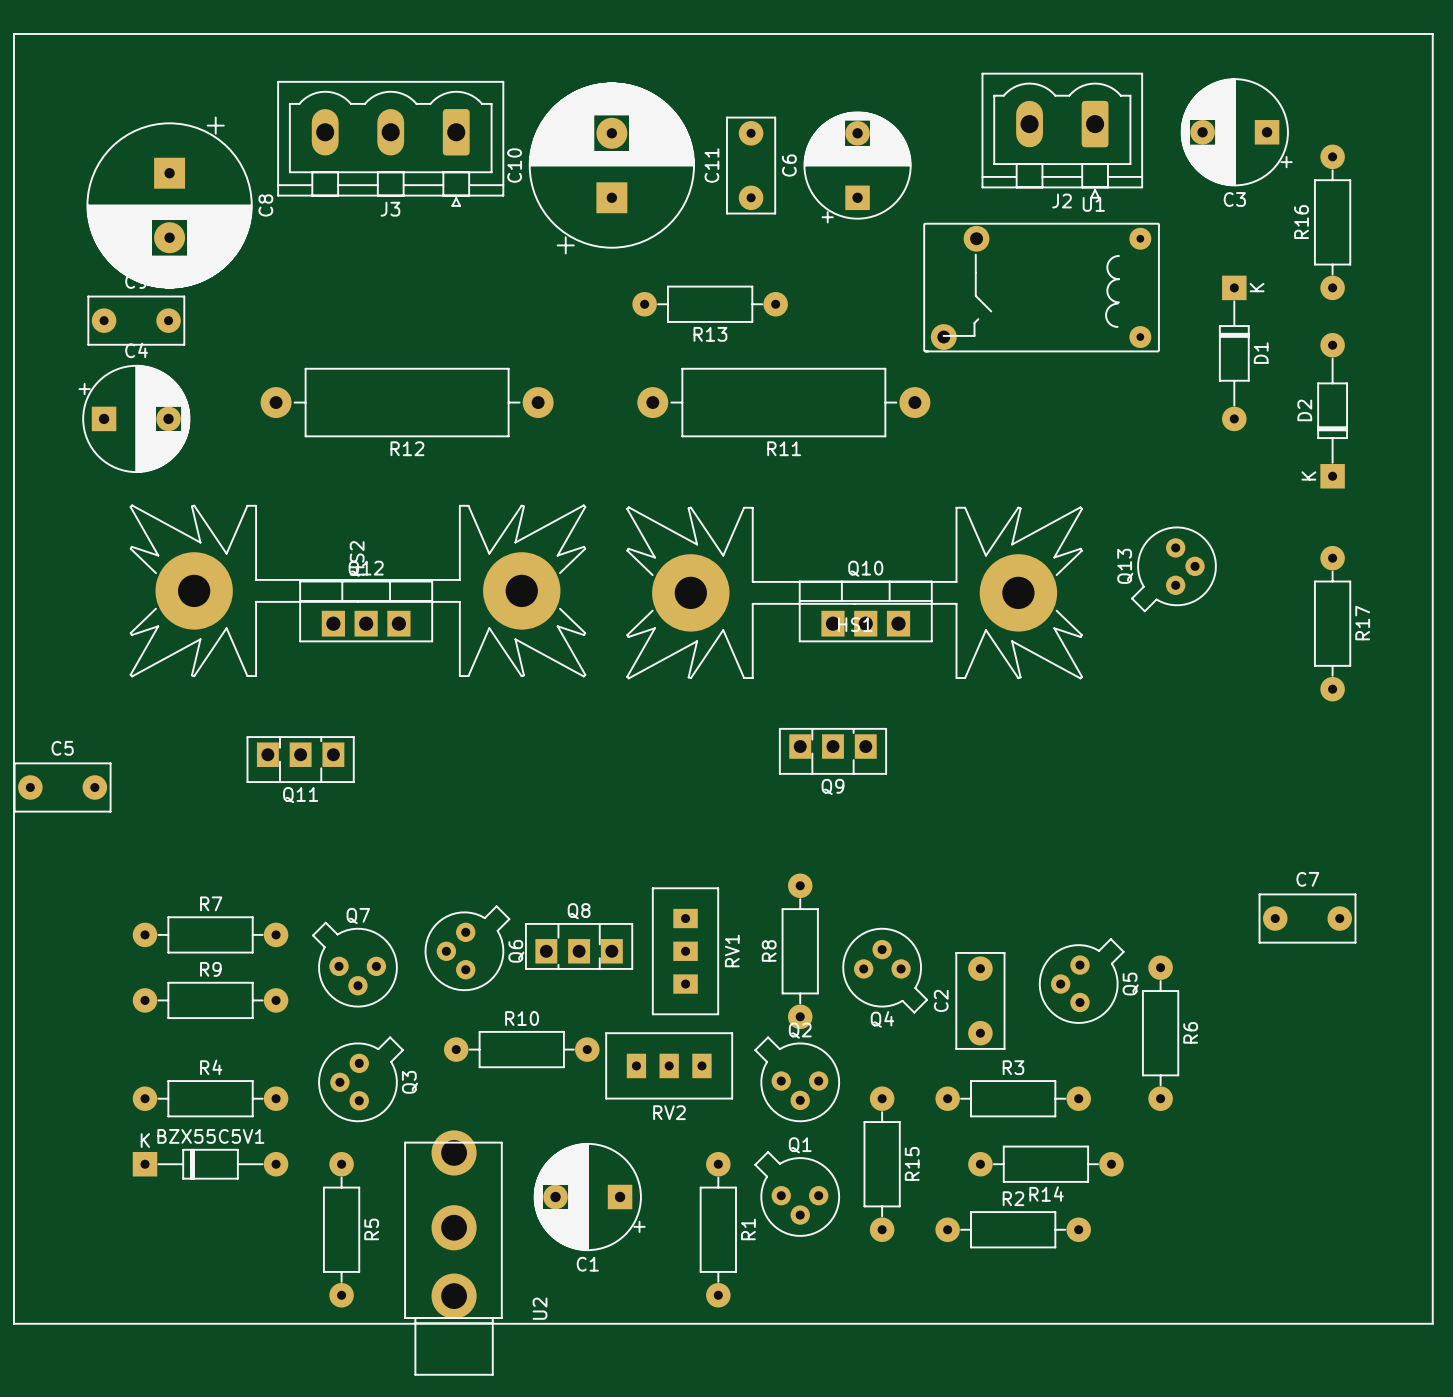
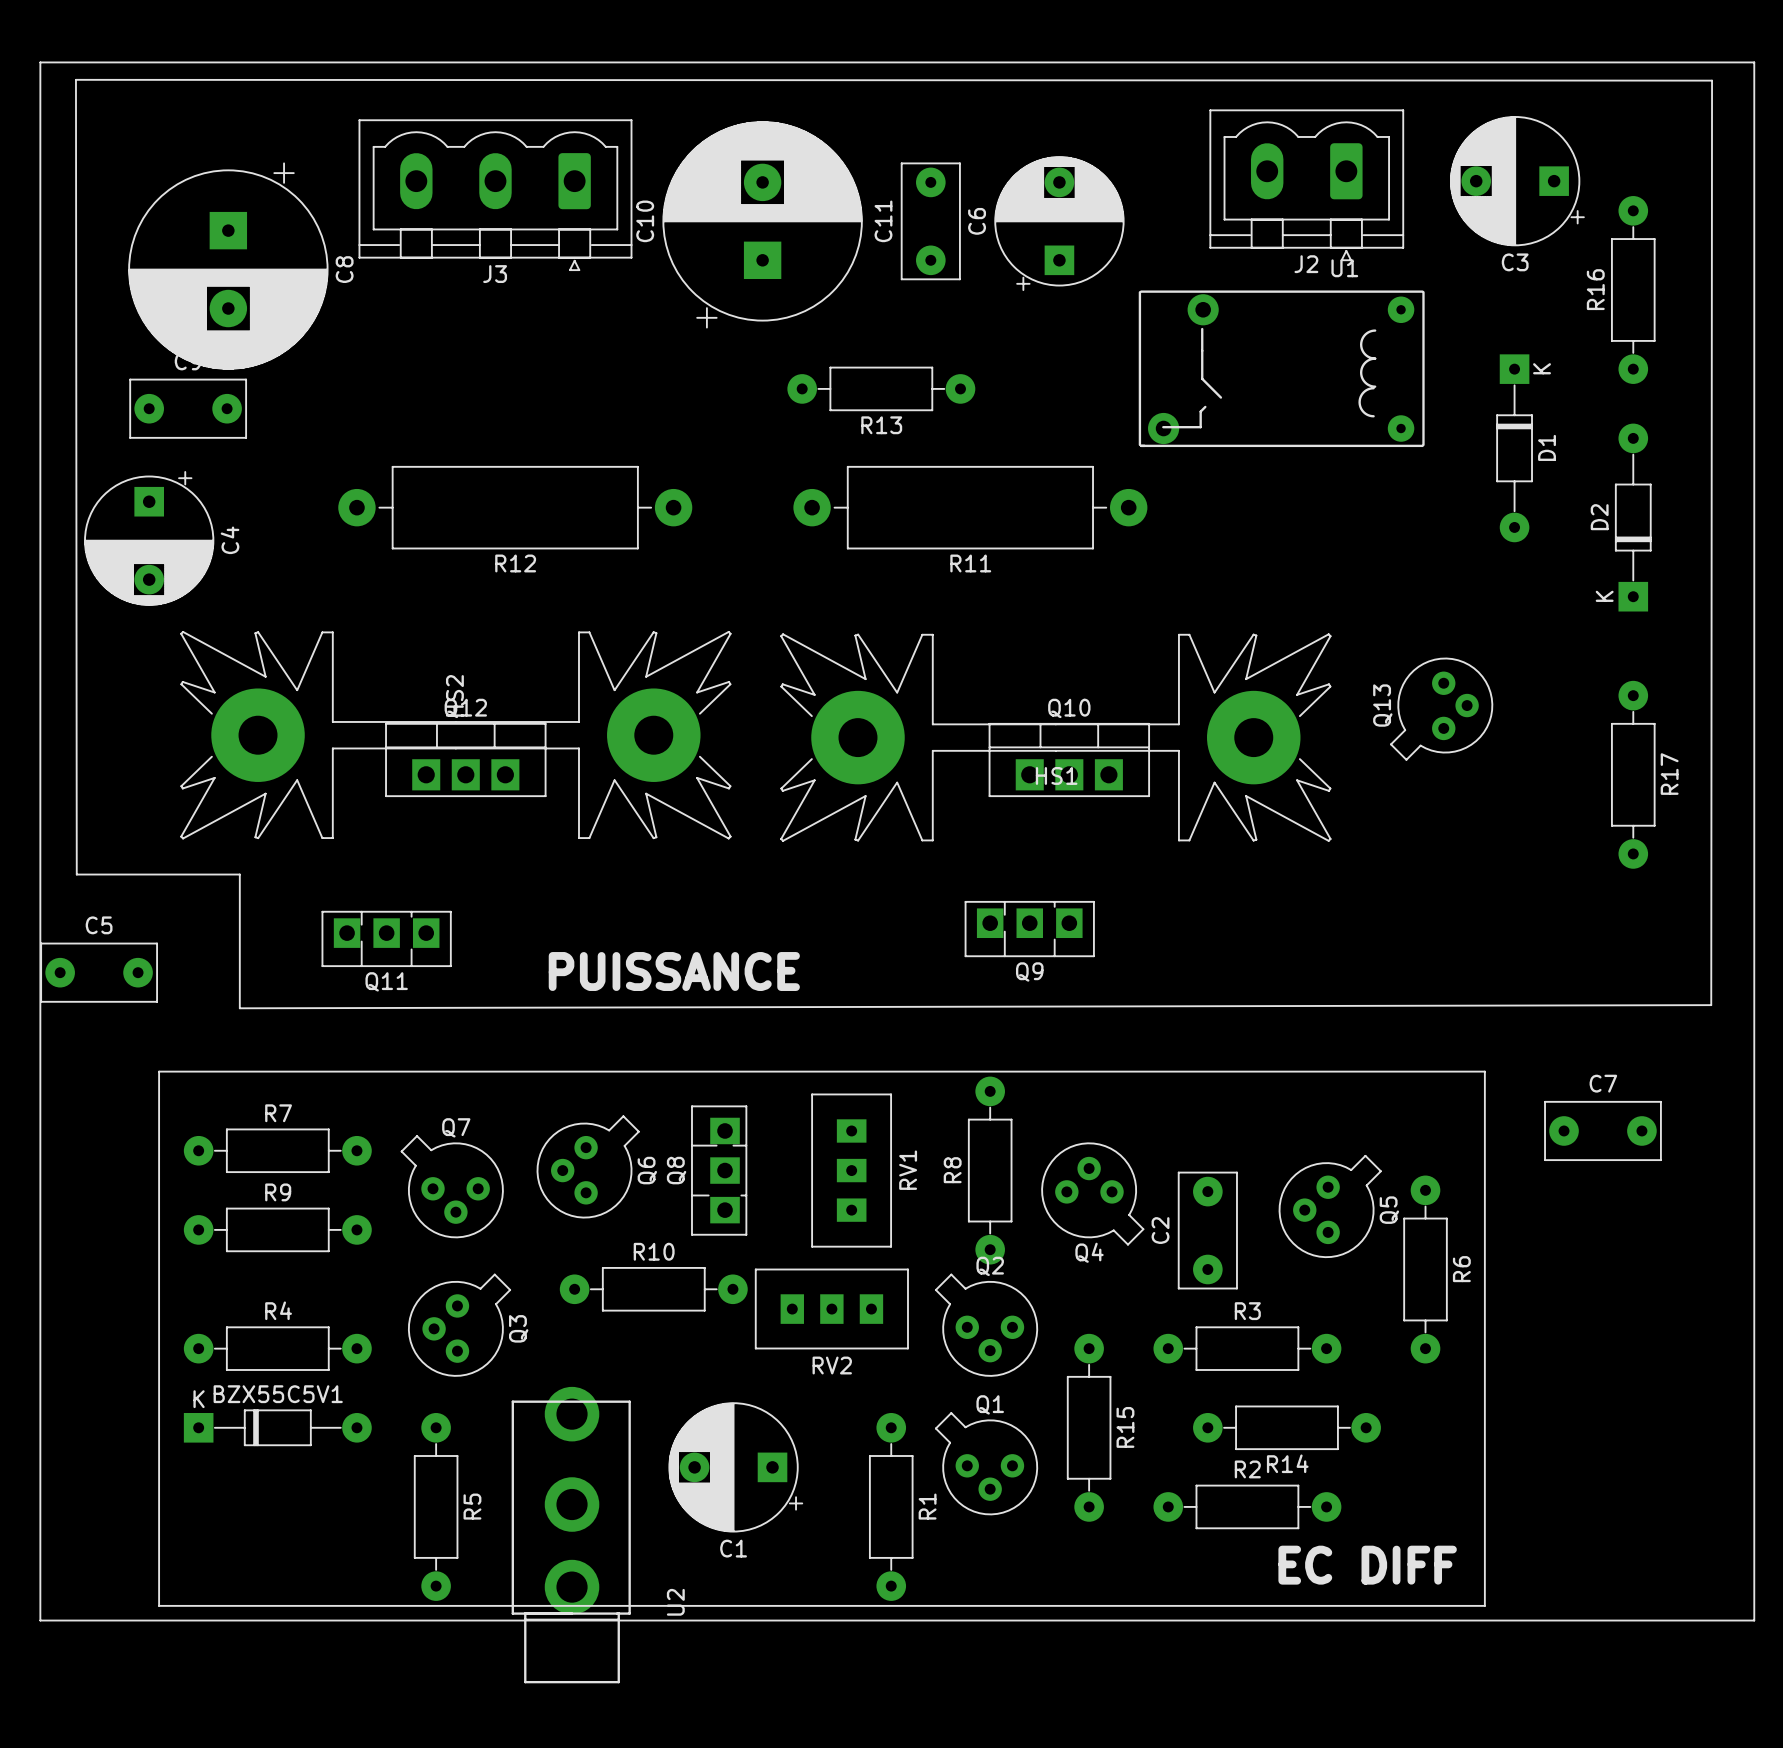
line: none -> (75, 79) (76, 874) (239, 874) (239, 1008) (1711, 1005) (1712, 80) (75, 79)
C4 rotation: 0° (134, 418) -> 90° clockwise (149, 538)
text: none -> PUISSANCE (674, 971)
line: none -> (159, 1071) (159, 1605) (1484, 1605) (1484, 1071) (159, 1071)
Q8 rotation: 0° (579, 946) -> 90° counterclockwise (719, 1170)
text: none -> EC DIFF (1367, 1565)

